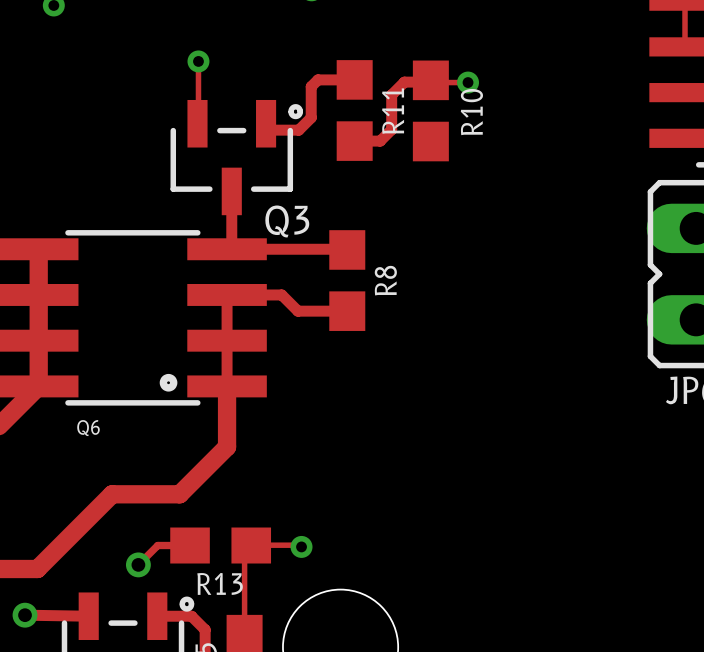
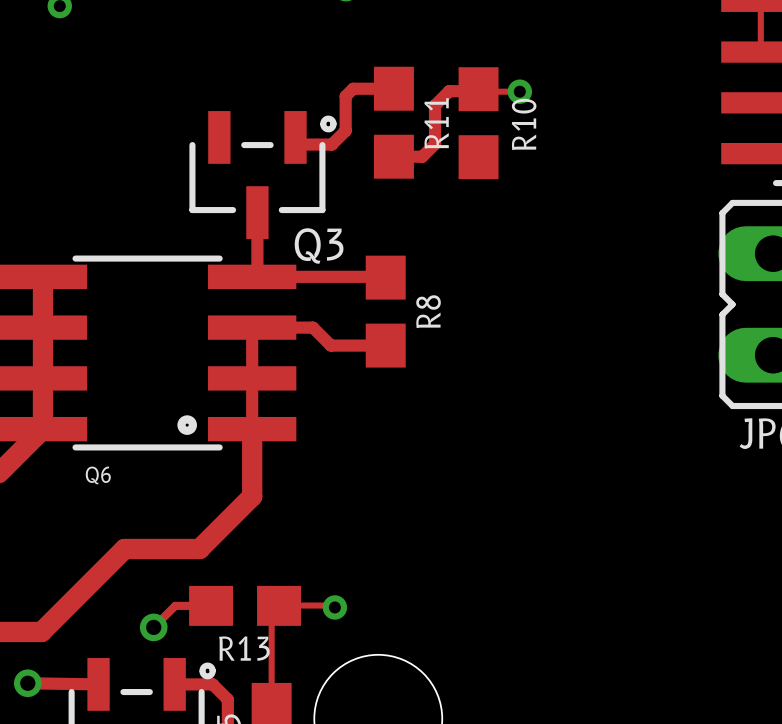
track: (198, 61) (197, 123) -> none
via: (198, 61) -> none

